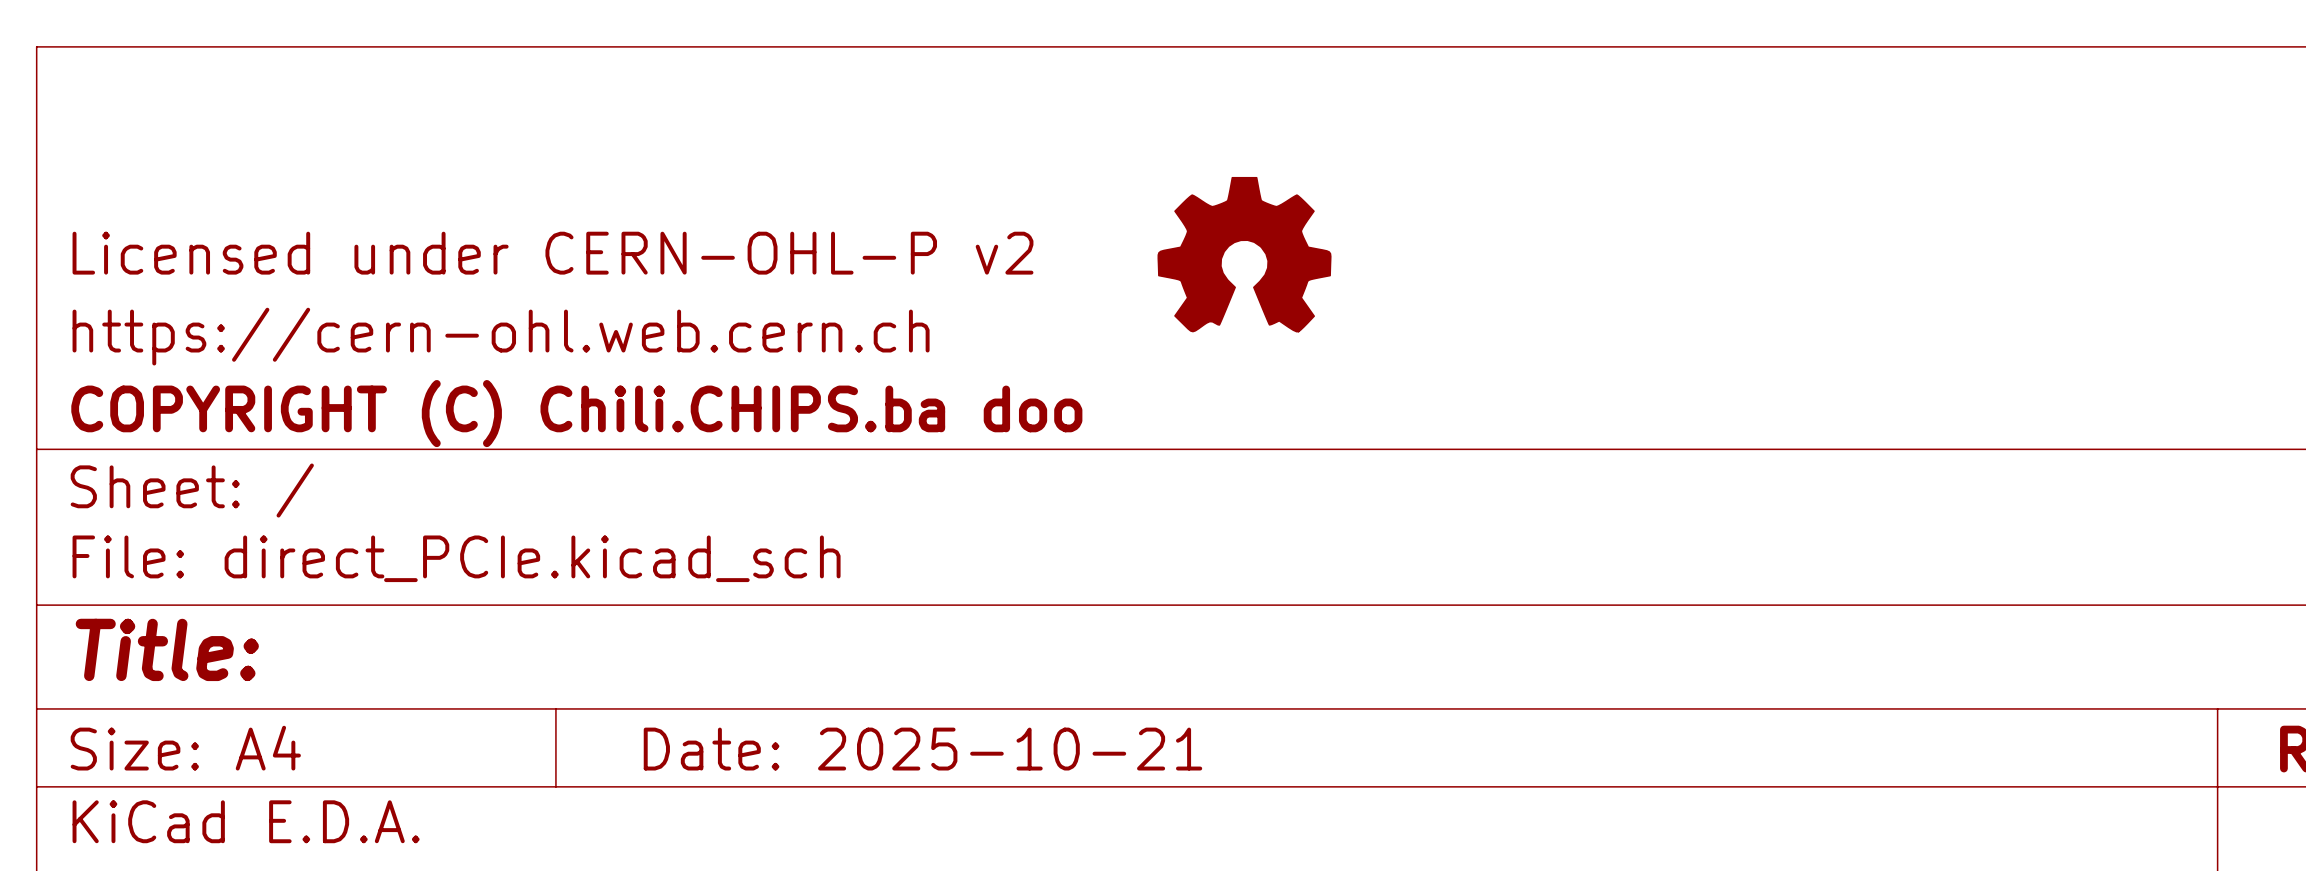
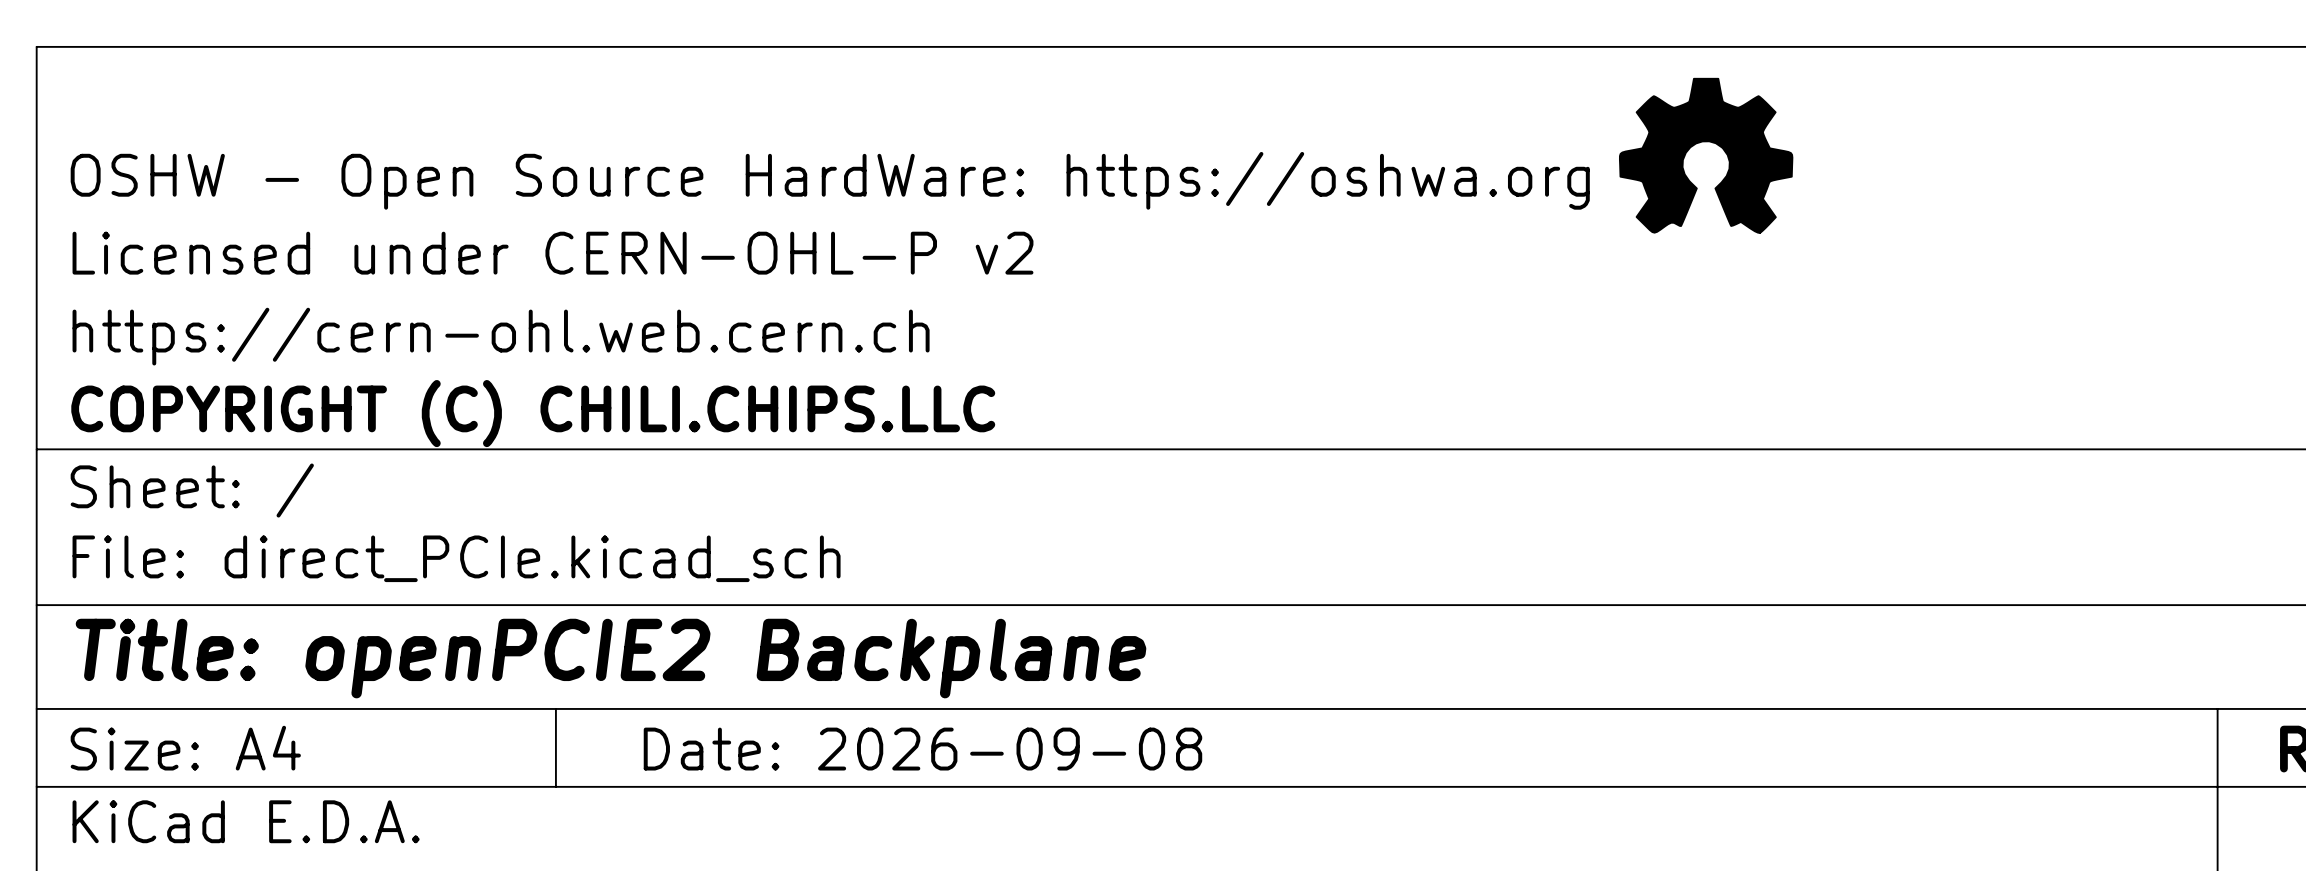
title block: none -> OSHW - Open Source HardWare: https://oshwa.org (830, 180)
part position: (1244, 254) -> (1706, 155)
title block: COPYRIGHT (C) Chili.CHIPS.ba doo (576, 413) -> COPYRIGHT (C) CHILI.CHIPS.LLC (533, 413)
title block: Title: (167, 649) -> Title: openPCIE2 Backplane (611, 658)
title block: Date: 2025-10-21 (922, 749) -> Date: 2026-09-08 (922, 749)

